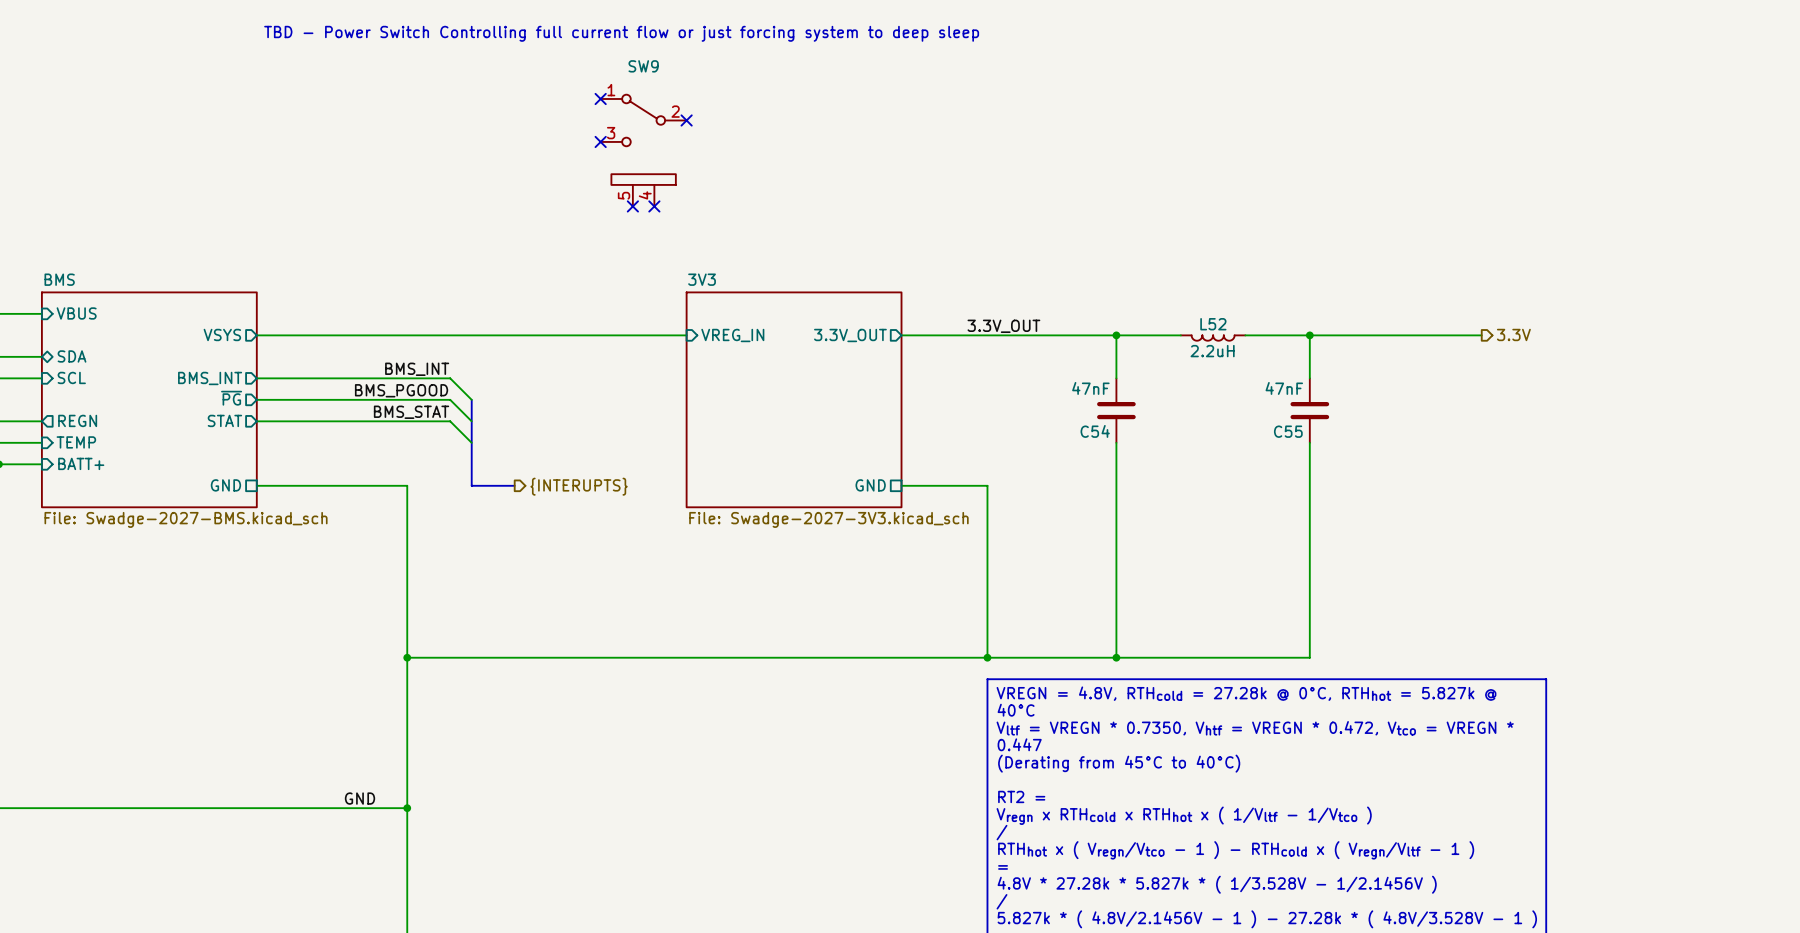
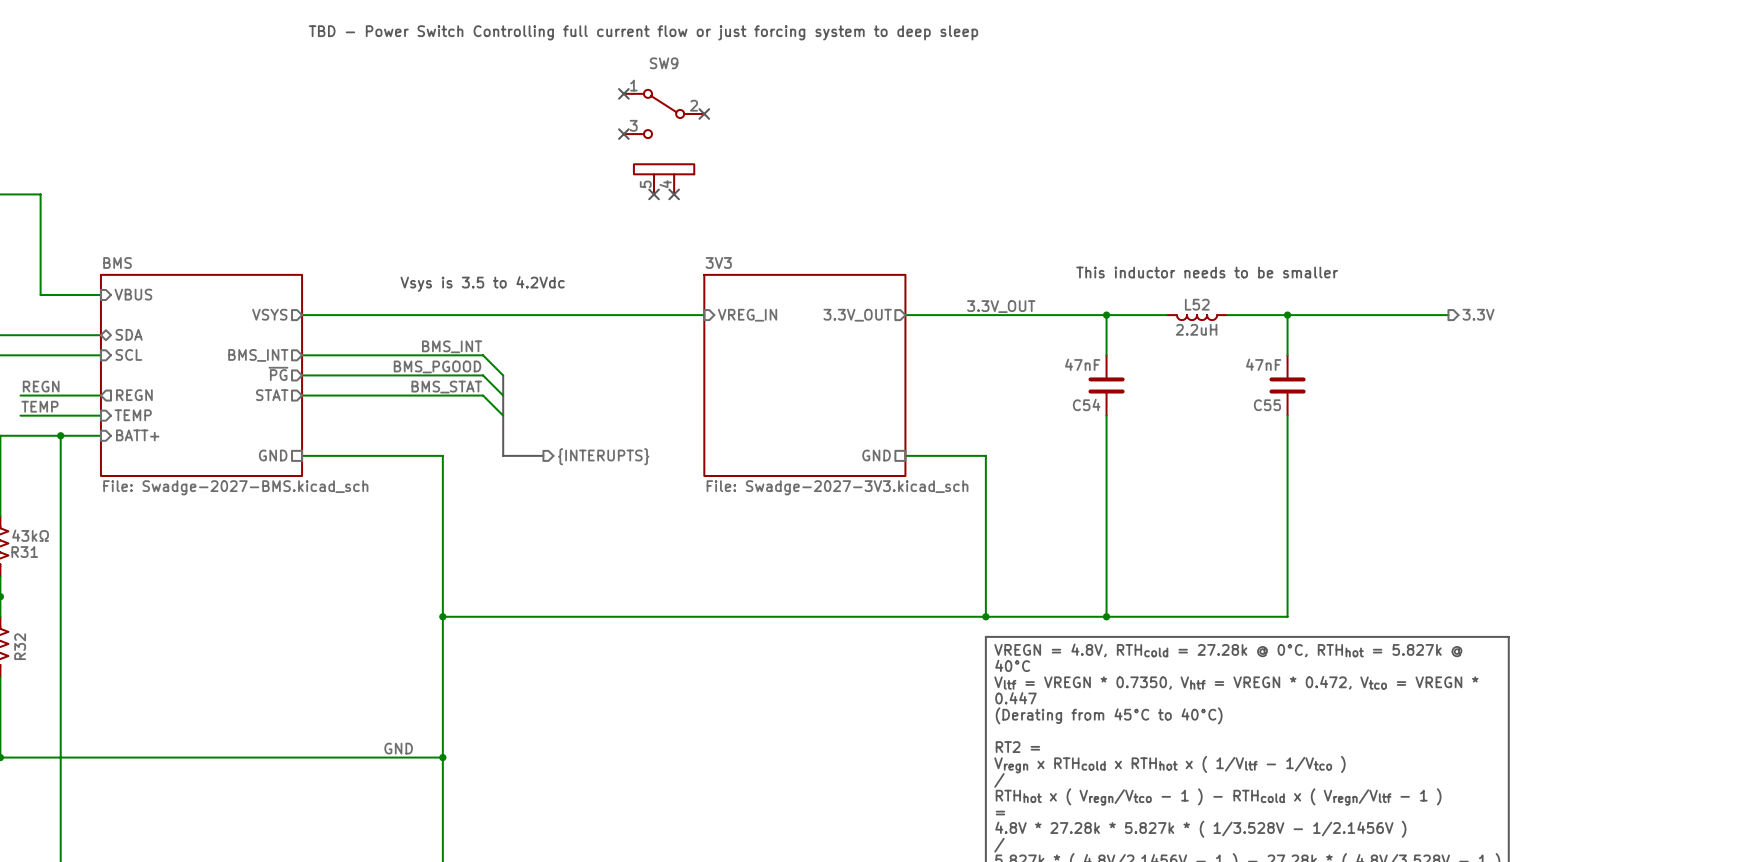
text: none -> This inductor needs to be smaller (1207, 272)
text: none -> Vsys is 3.5 to 4.2Vdc (482, 284)

